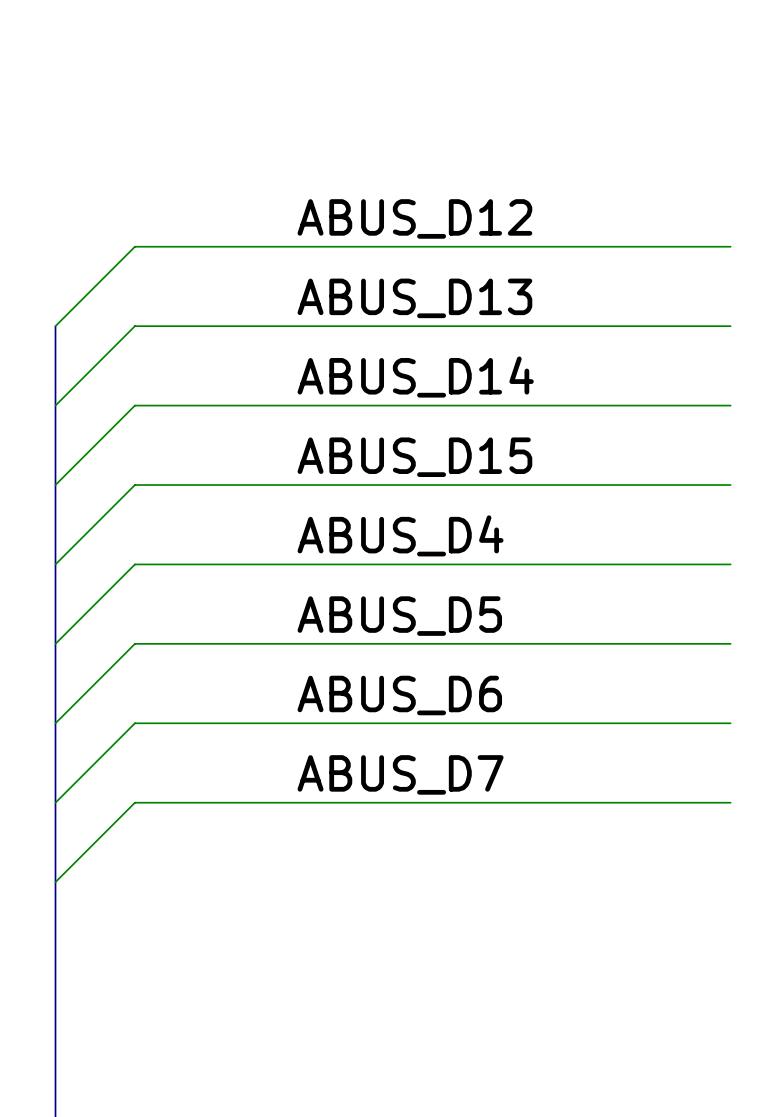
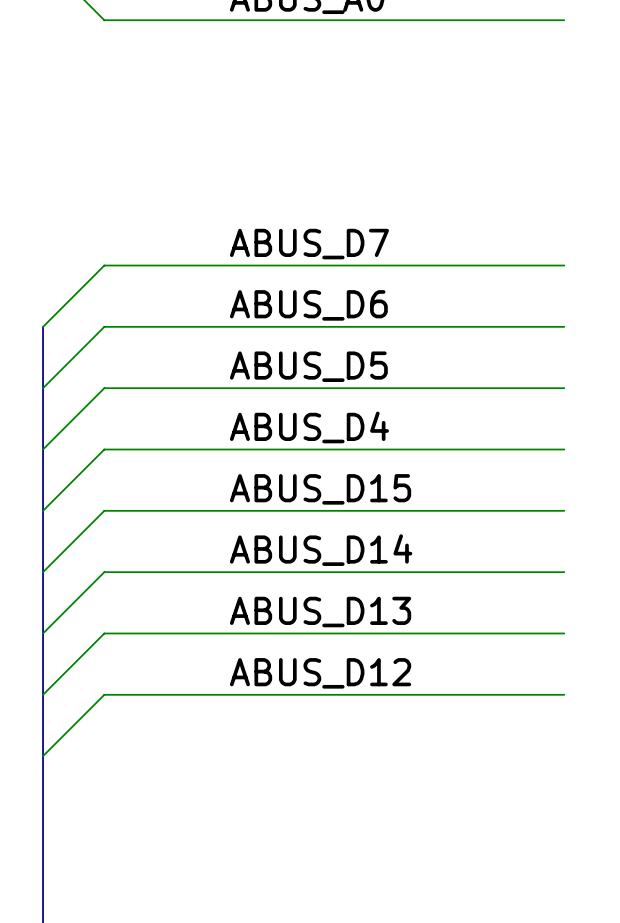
label: ABUS_D12 (414, 218) -> ABUS_D7 (309, 244)
label: ABUS_D13 (414, 298) -> ABUS_D6 (308, 305)
label: ABUS_D14 (415, 377) -> ABUS_D5 (308, 366)
label: ABUS_D15 (414, 457) -> ABUS_D4 (309, 427)
label: ABUS_D4 (400, 535) -> ABUS_D15 (320, 489)
label: ABUS_D5 (399, 616) -> ABUS_D14 (321, 550)
label: ABUS_D6 (399, 695) -> ABUS_D13 (320, 612)
label: ABUS_D7 (400, 774) -> ABUS_D12 (320, 673)

